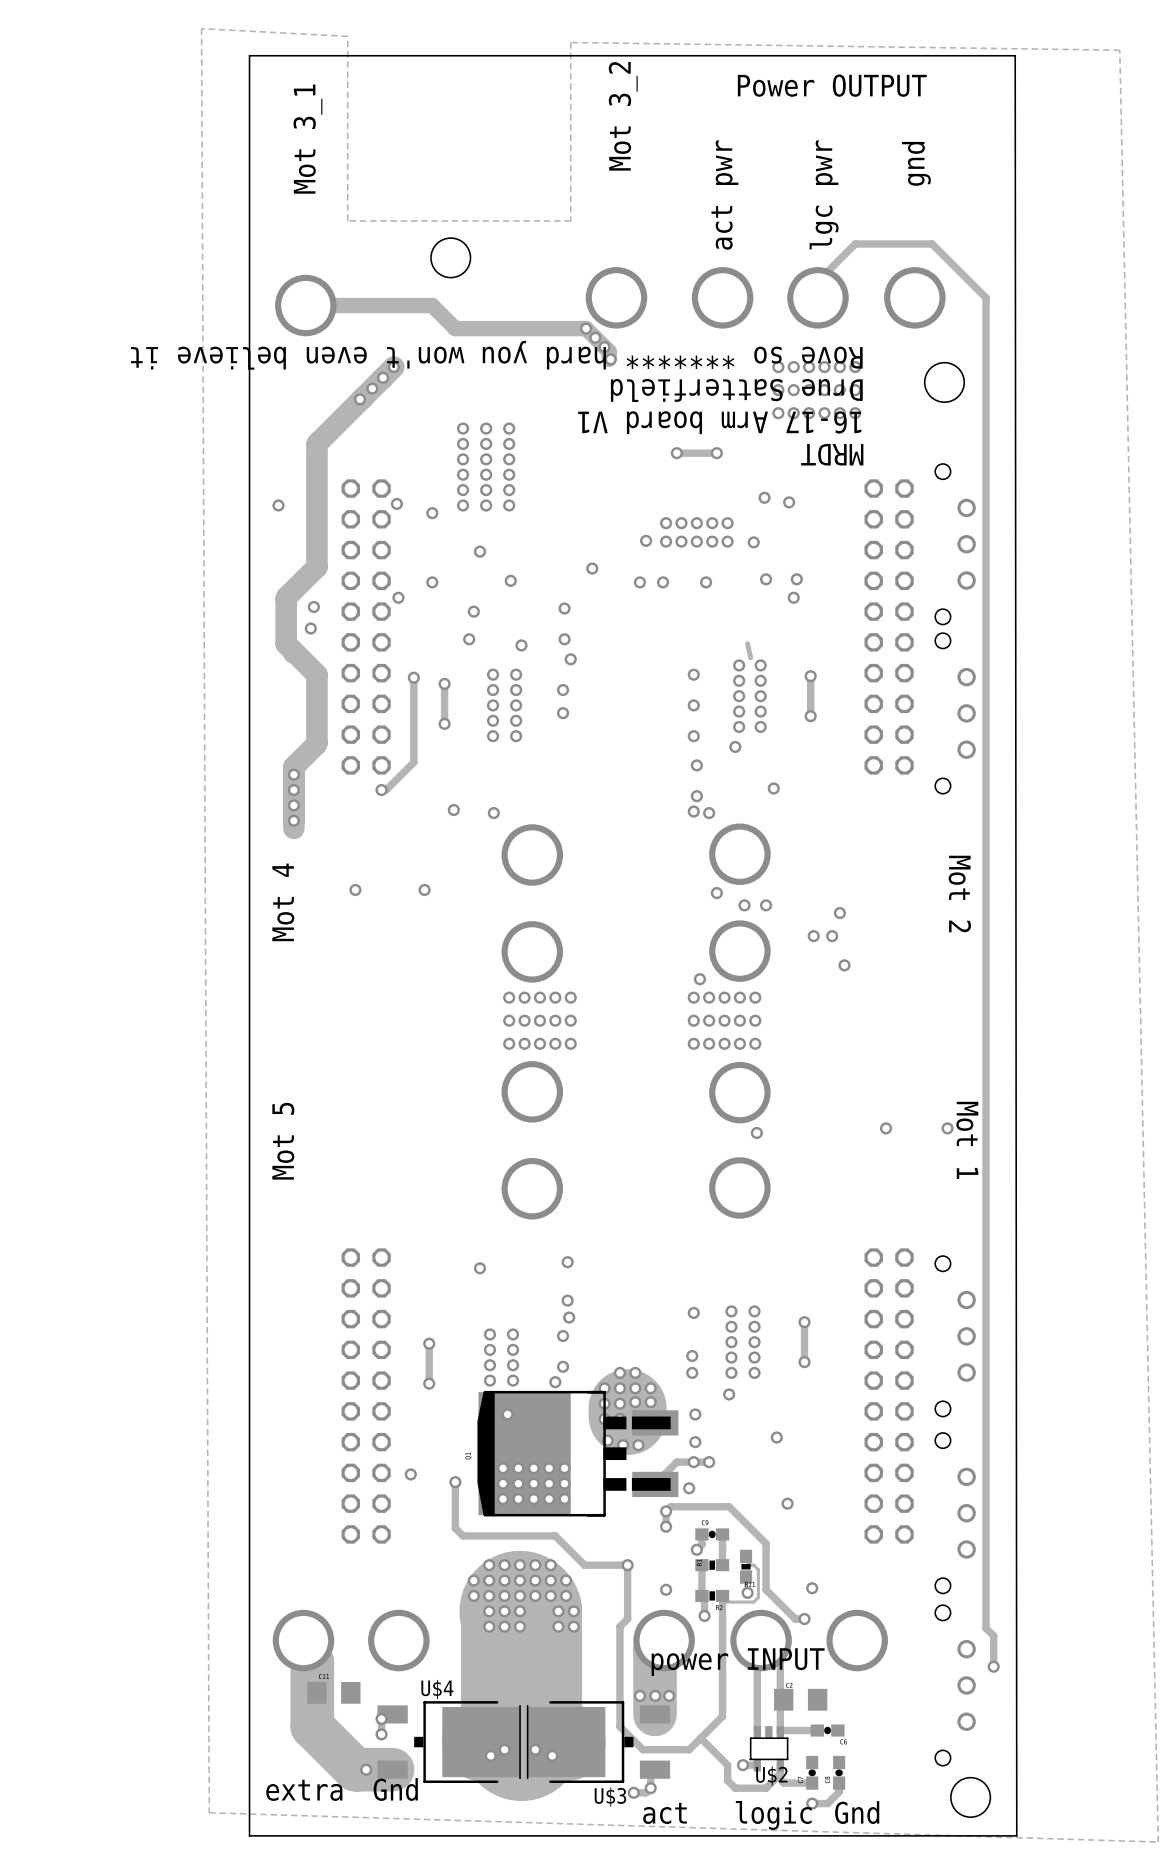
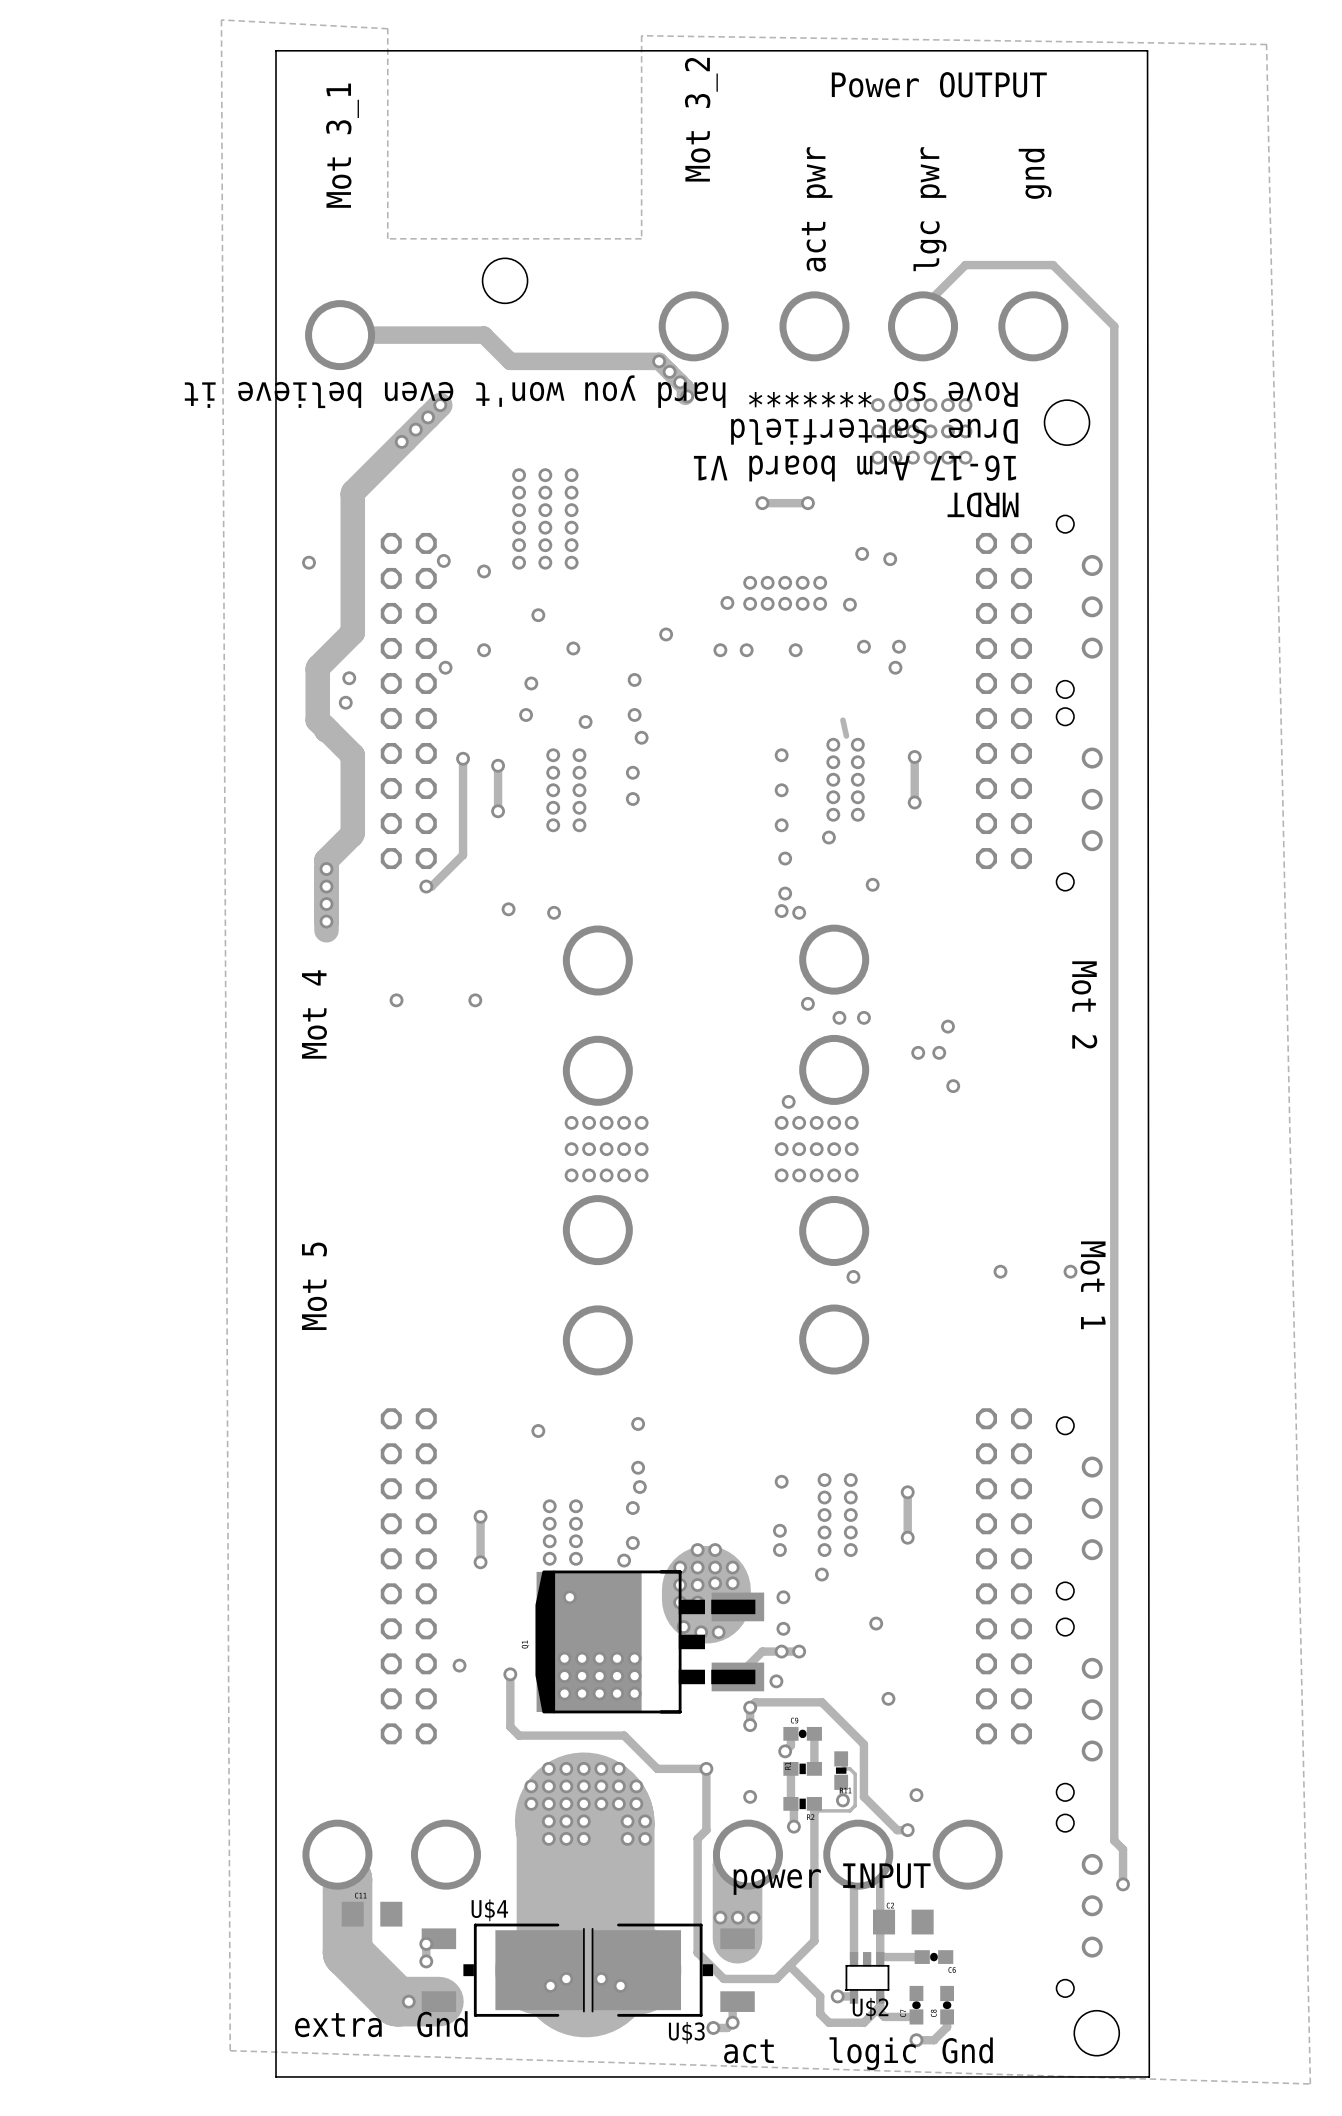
text position: Rove so ******* hard you won't even believe it (496, 355) -> Rove so ******* hard you won't even believe it (601, 391)
text position: Drue Satterfield (736, 390) -> Drue Satterfield (874, 431)
text position: 16-17 Arm board V1 (719, 422) -> 16-17 Arm board V1 (855, 468)
text position: MRDT (832, 454) -> MRDT (983, 504)

